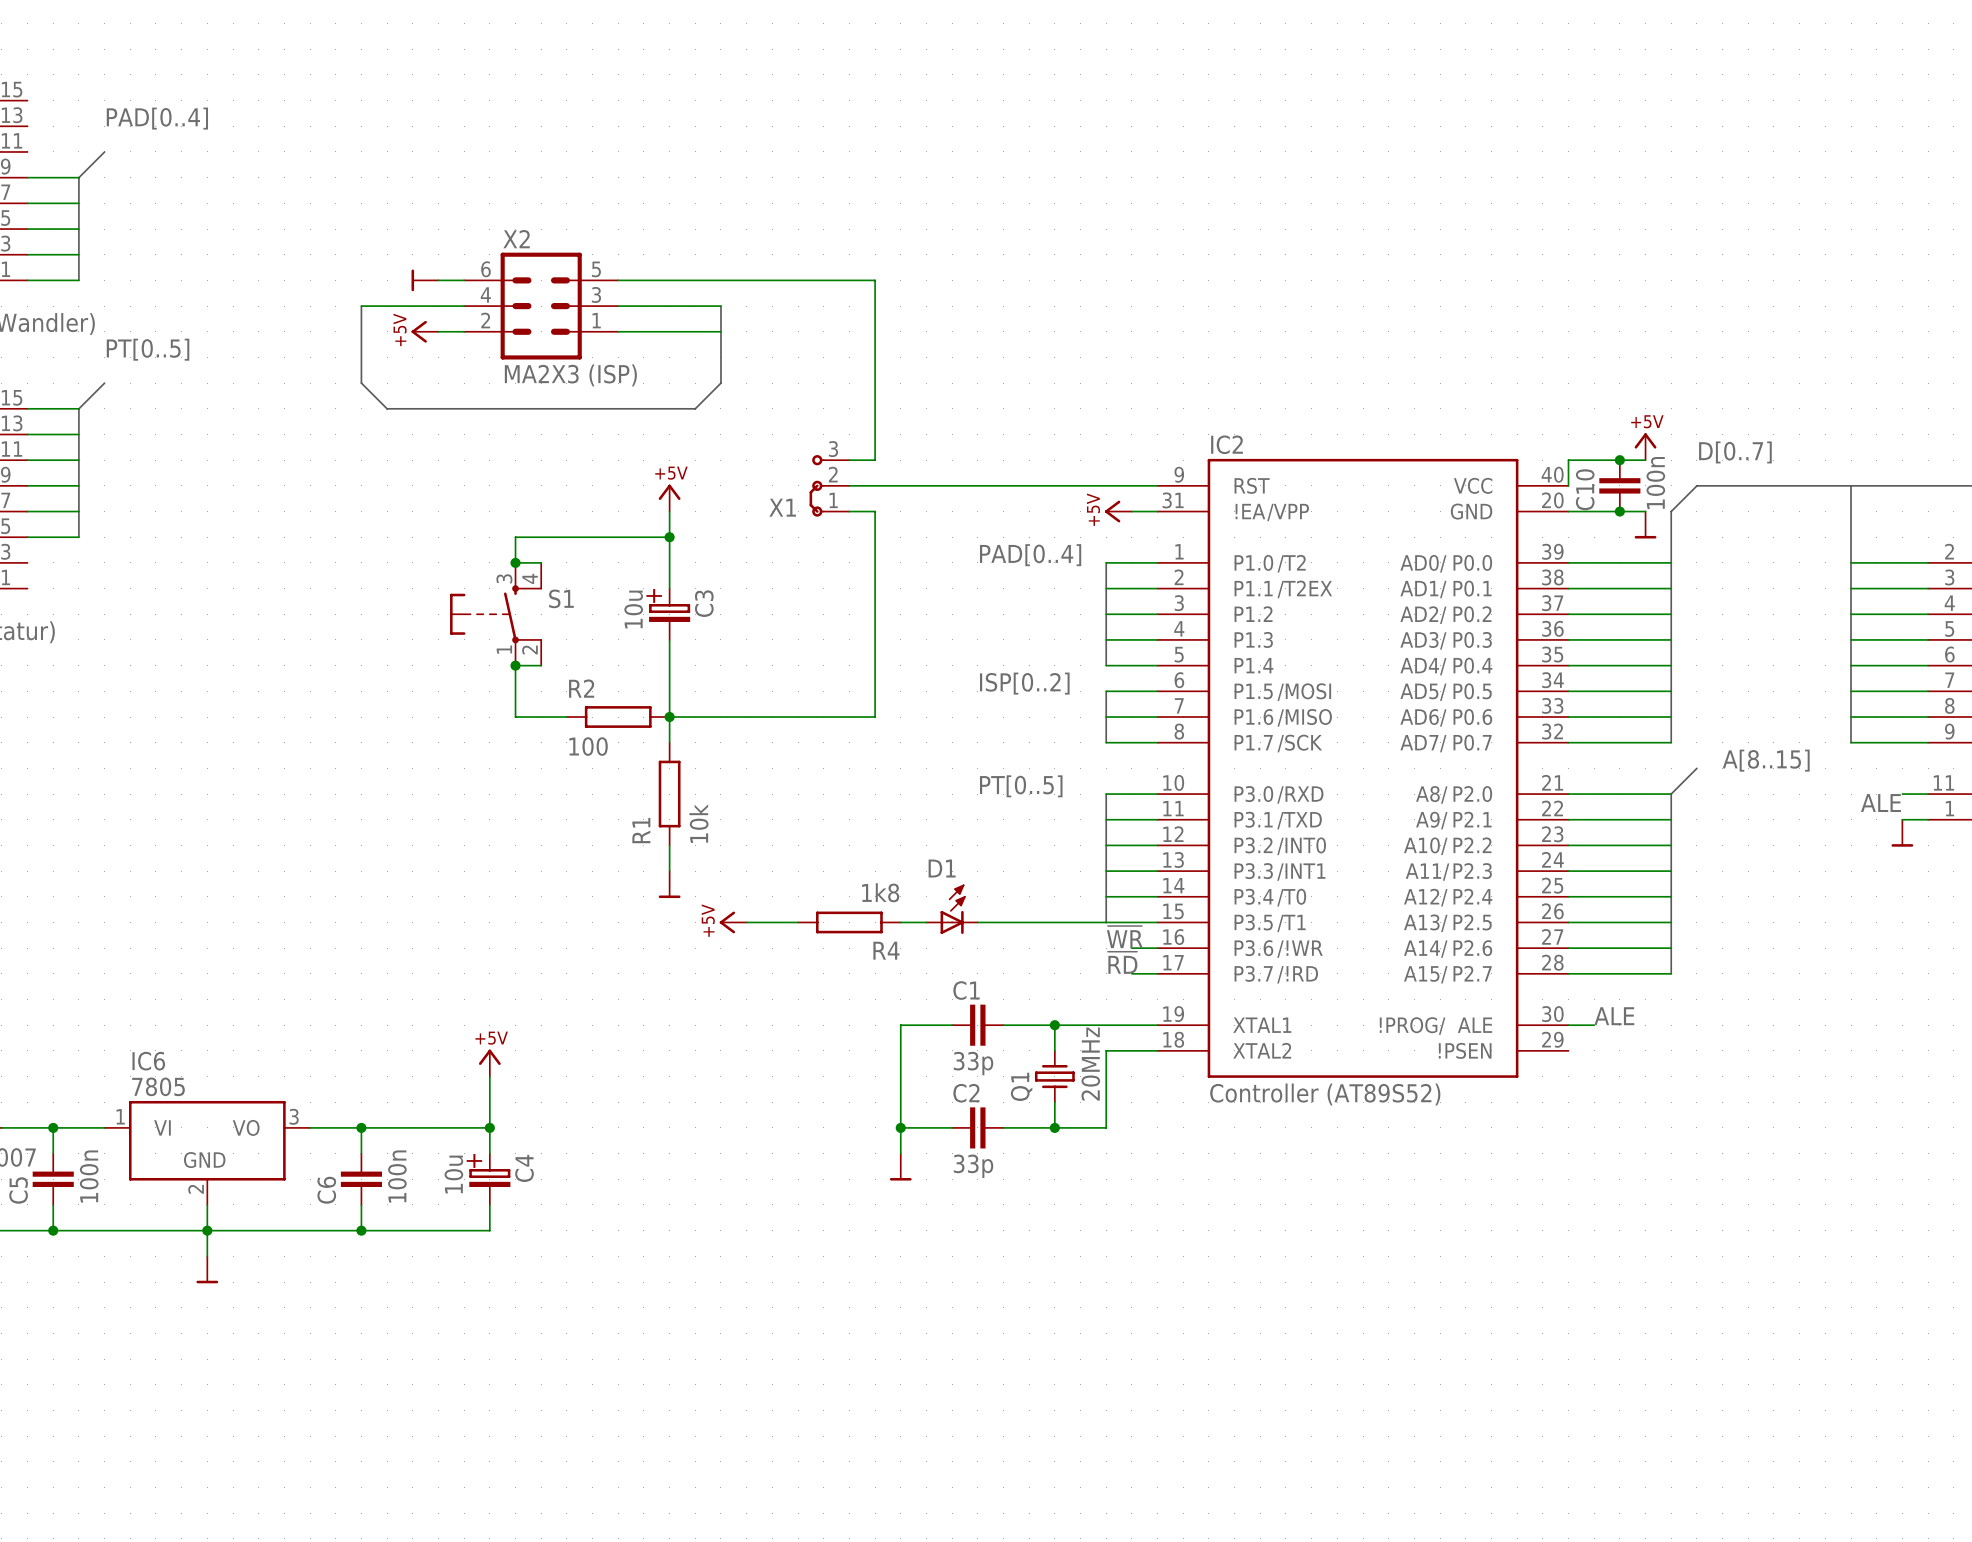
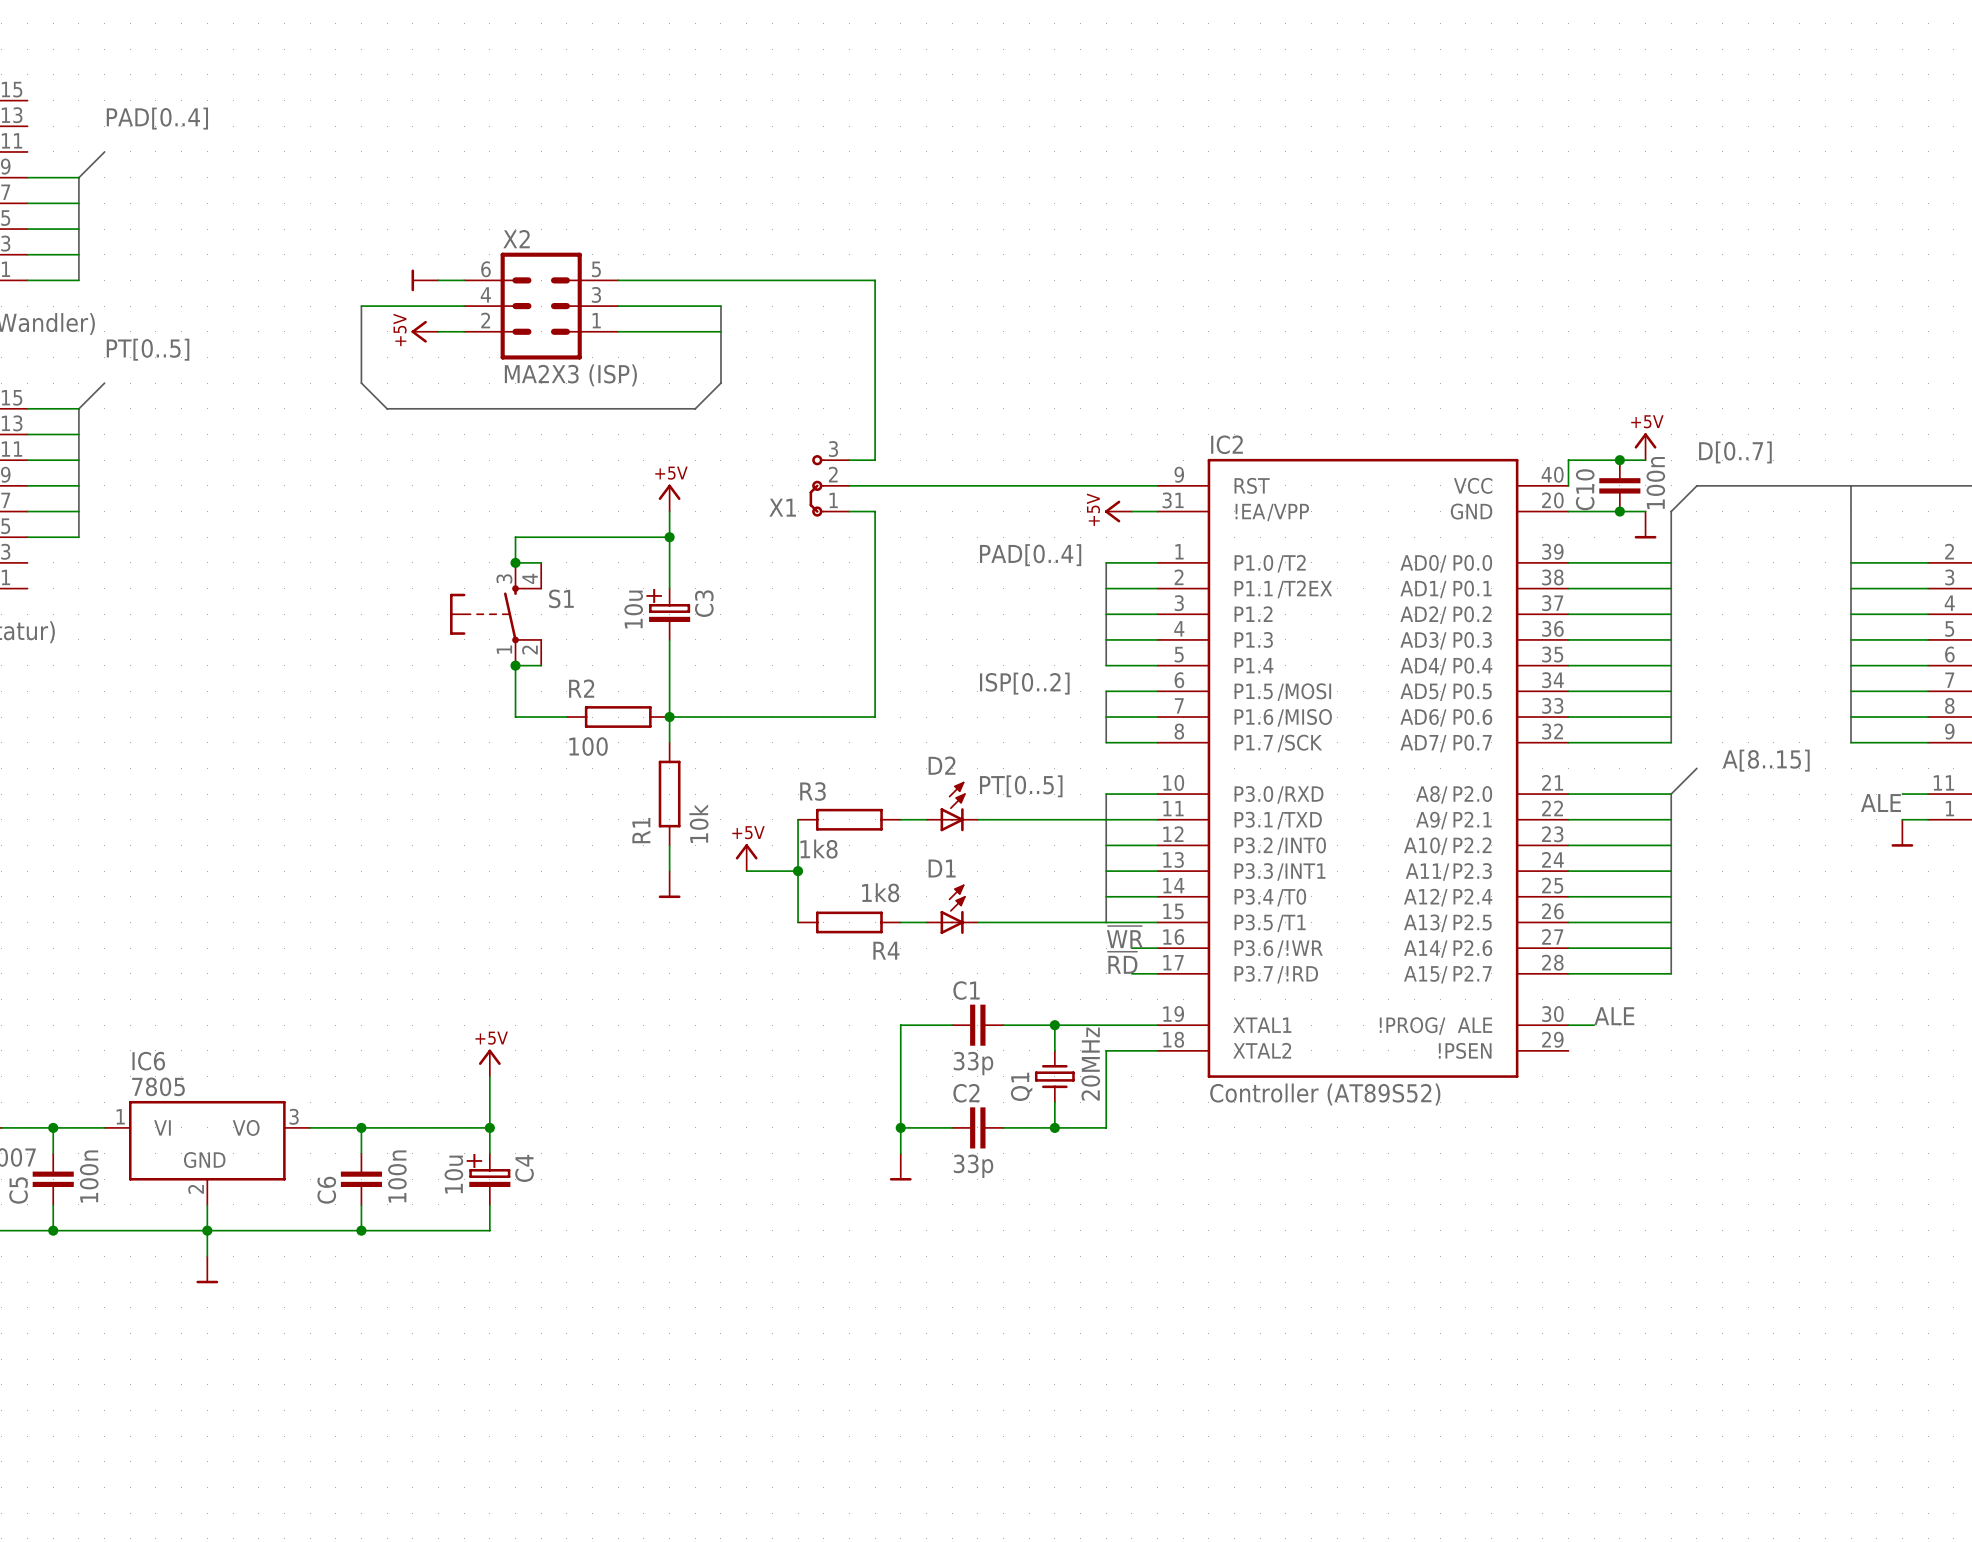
D2: none -> (952, 806)
R3: none -> 1k8 (849, 819)
wire: none -> (900, 819) (926, 819)
wire: none -> (977, 819) (1106, 819)
wire: none -> (746, 871) (798, 871)
junction: none -> (798, 871)
power symbol rotation: 0° (727, 922) -> 90° clockwise (746, 851)
power symbol position: (733, 922) -> (746, 857)
wire: (746, 922) (798, 922) -> (798, 819) (798, 922)

